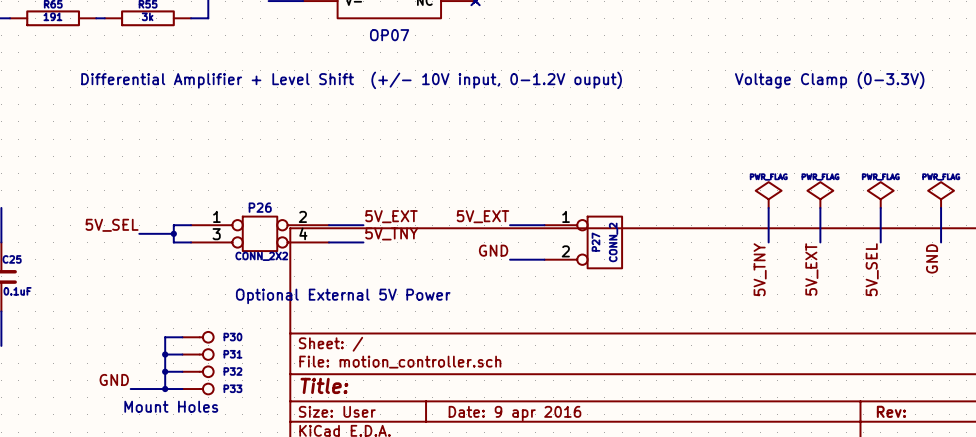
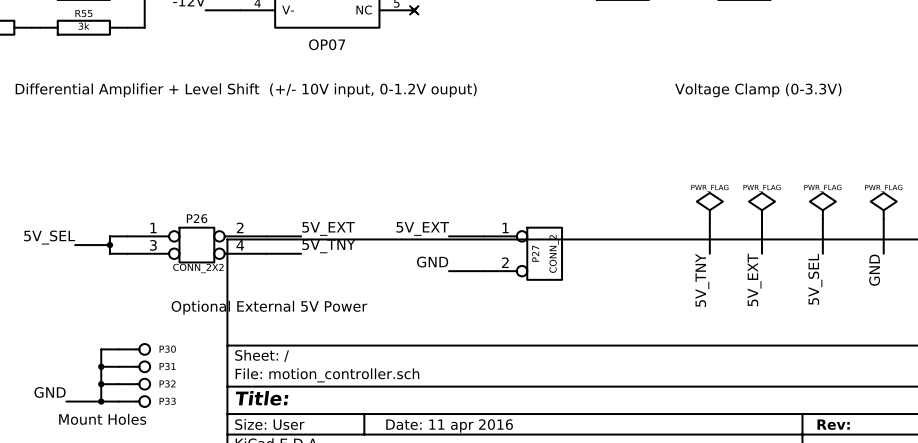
title block: Date: 9 apr 2016 (514, 413) -> Date: 11 apr 2016 (449, 425)

